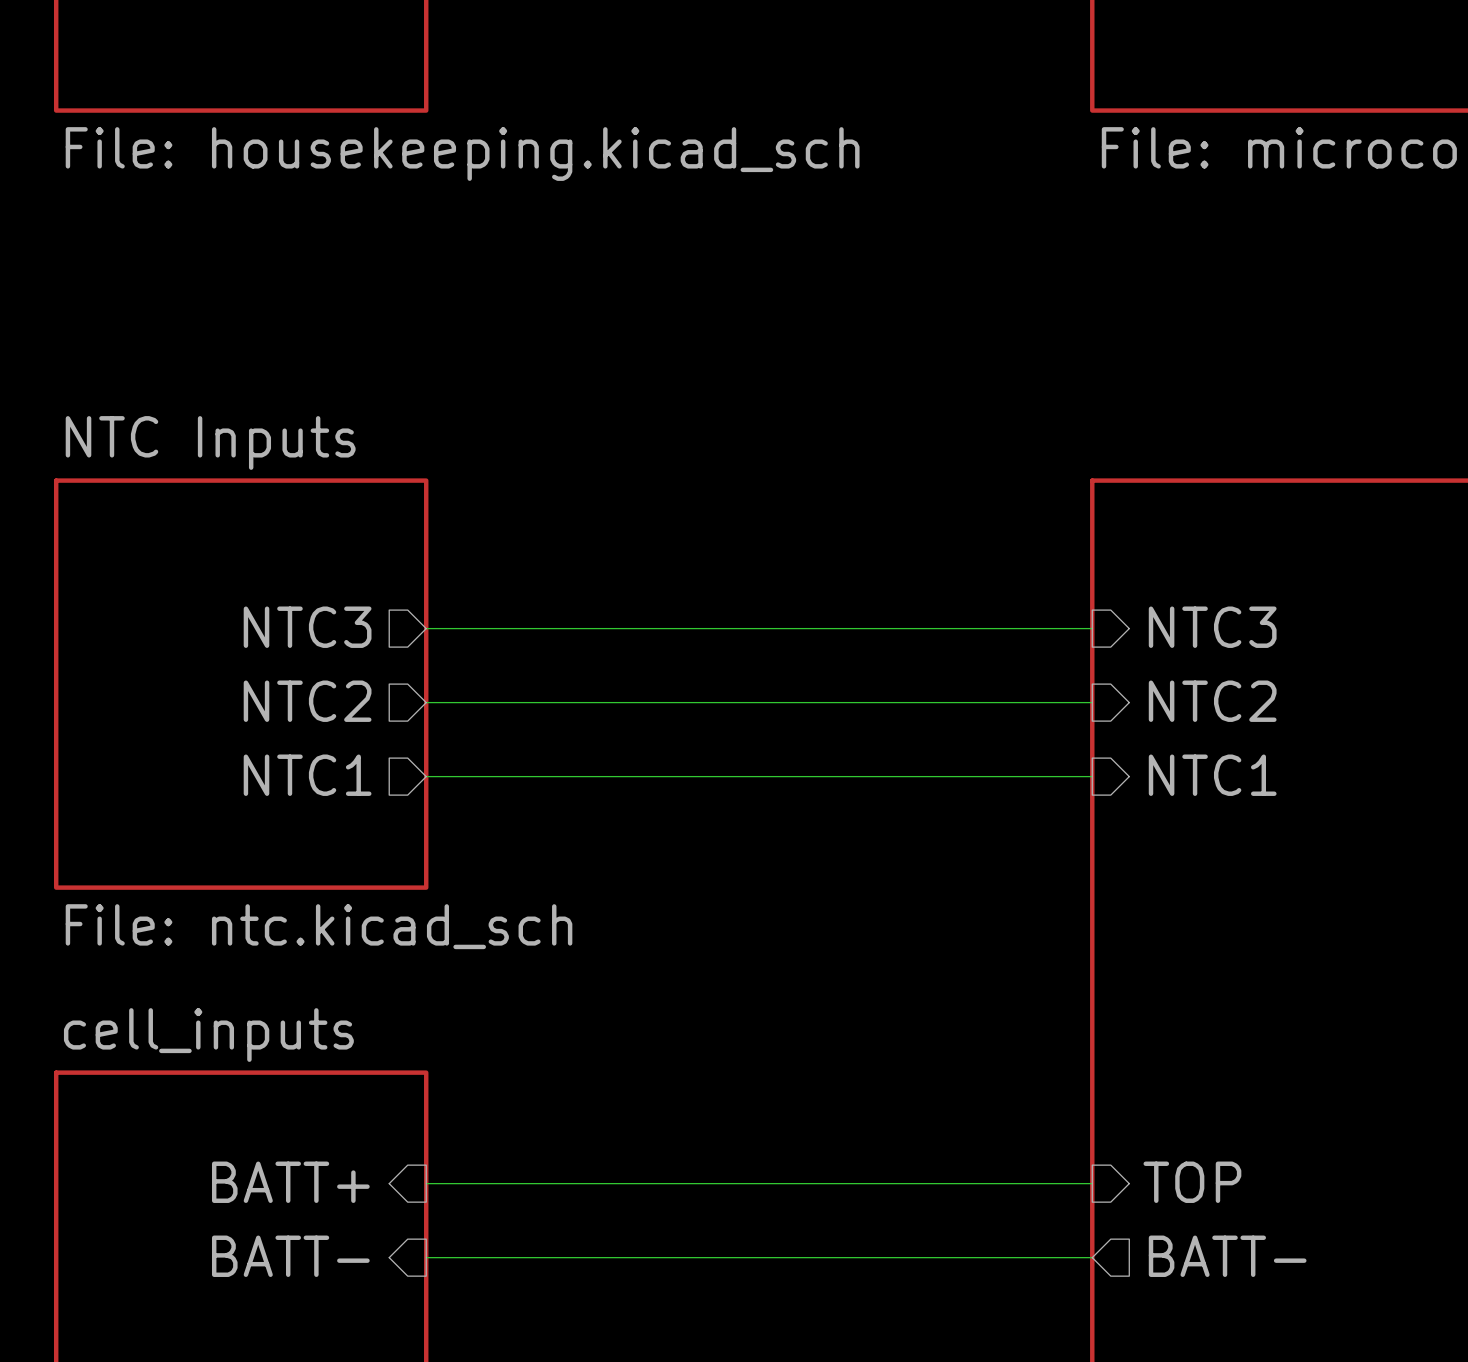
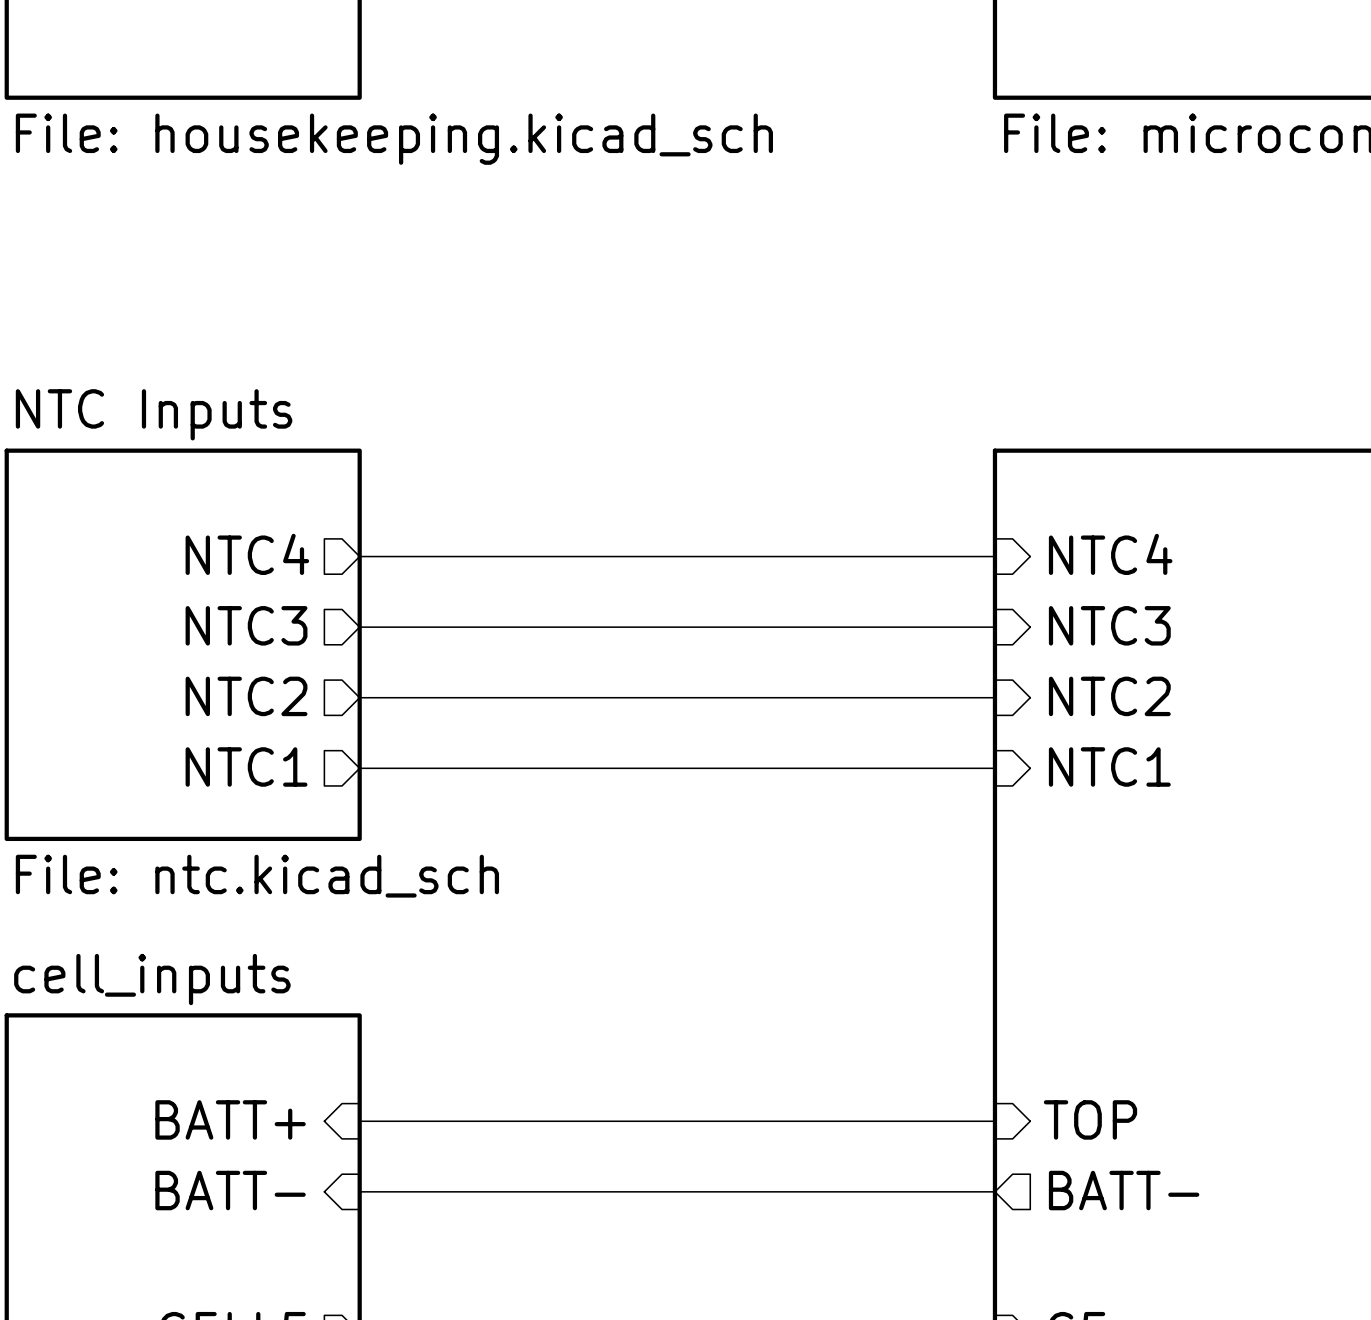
sheet pin: none -> NTC4 (247, 554)
sheet pin: none -> NTC4 (1110, 554)
sheet pin position: NTC3 (307, 627) -> NTC3 (246, 625)
sheet pin position: NTC3 (1212, 627) -> NTC3 (1109, 625)
wire: (426, 628) (1092, 628) -> (359, 556) (994, 556)
wire: none -> (359, 627) (994, 627)
sheet pin position: NTC2 (307, 701) -> NTC2 (246, 696)
sheet pin position: NTC2 (1212, 701) -> NTC2 (1109, 696)
wire: (426, 702) (1092, 702) -> (359, 697) (994, 697)
sheet pin position: NTC1 (307, 775) -> NTC1 (246, 766)
sheet pin position: NTC1 (1212, 775) -> NTC1 (1109, 766)
wire: (426, 776) (1092, 776) -> (359, 768) (994, 768)

